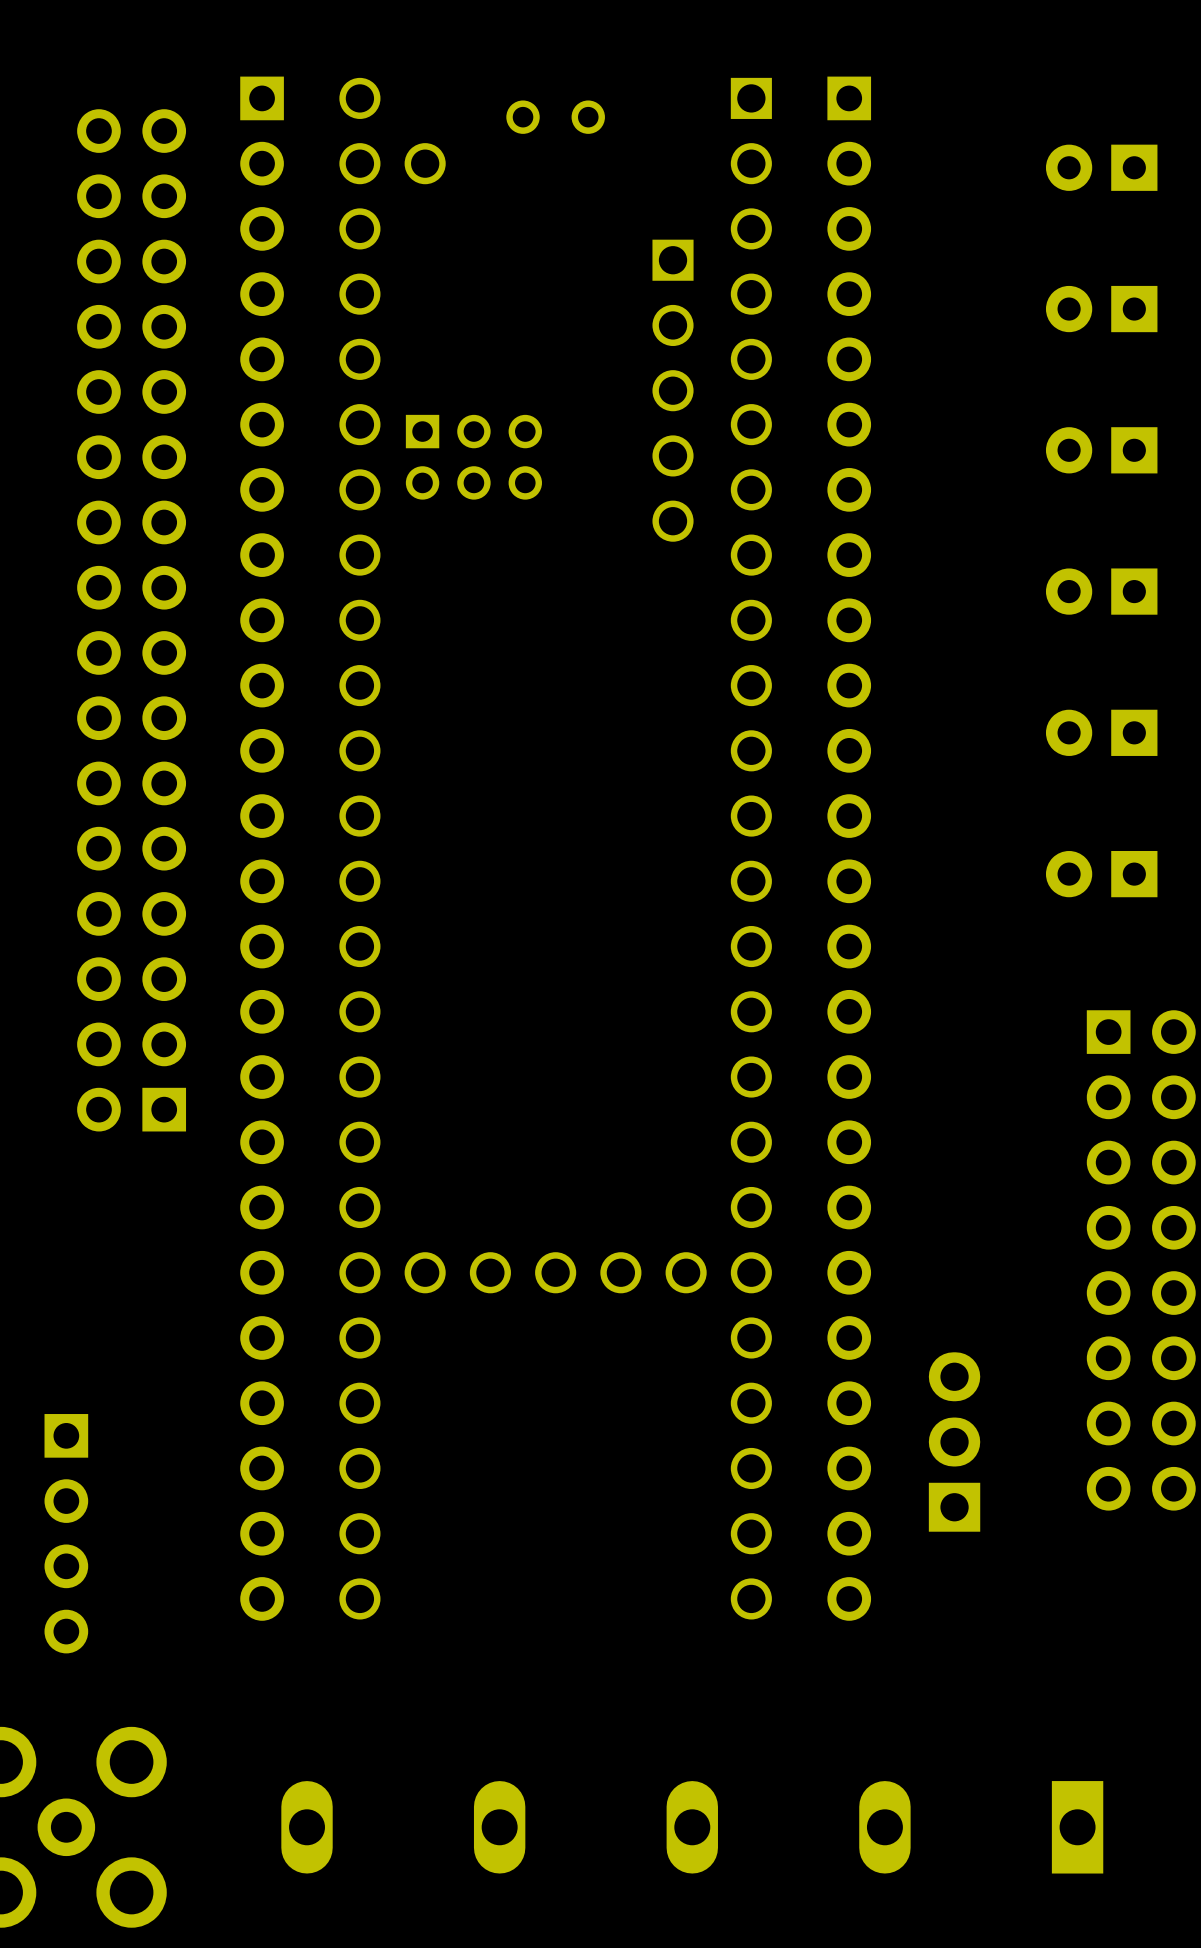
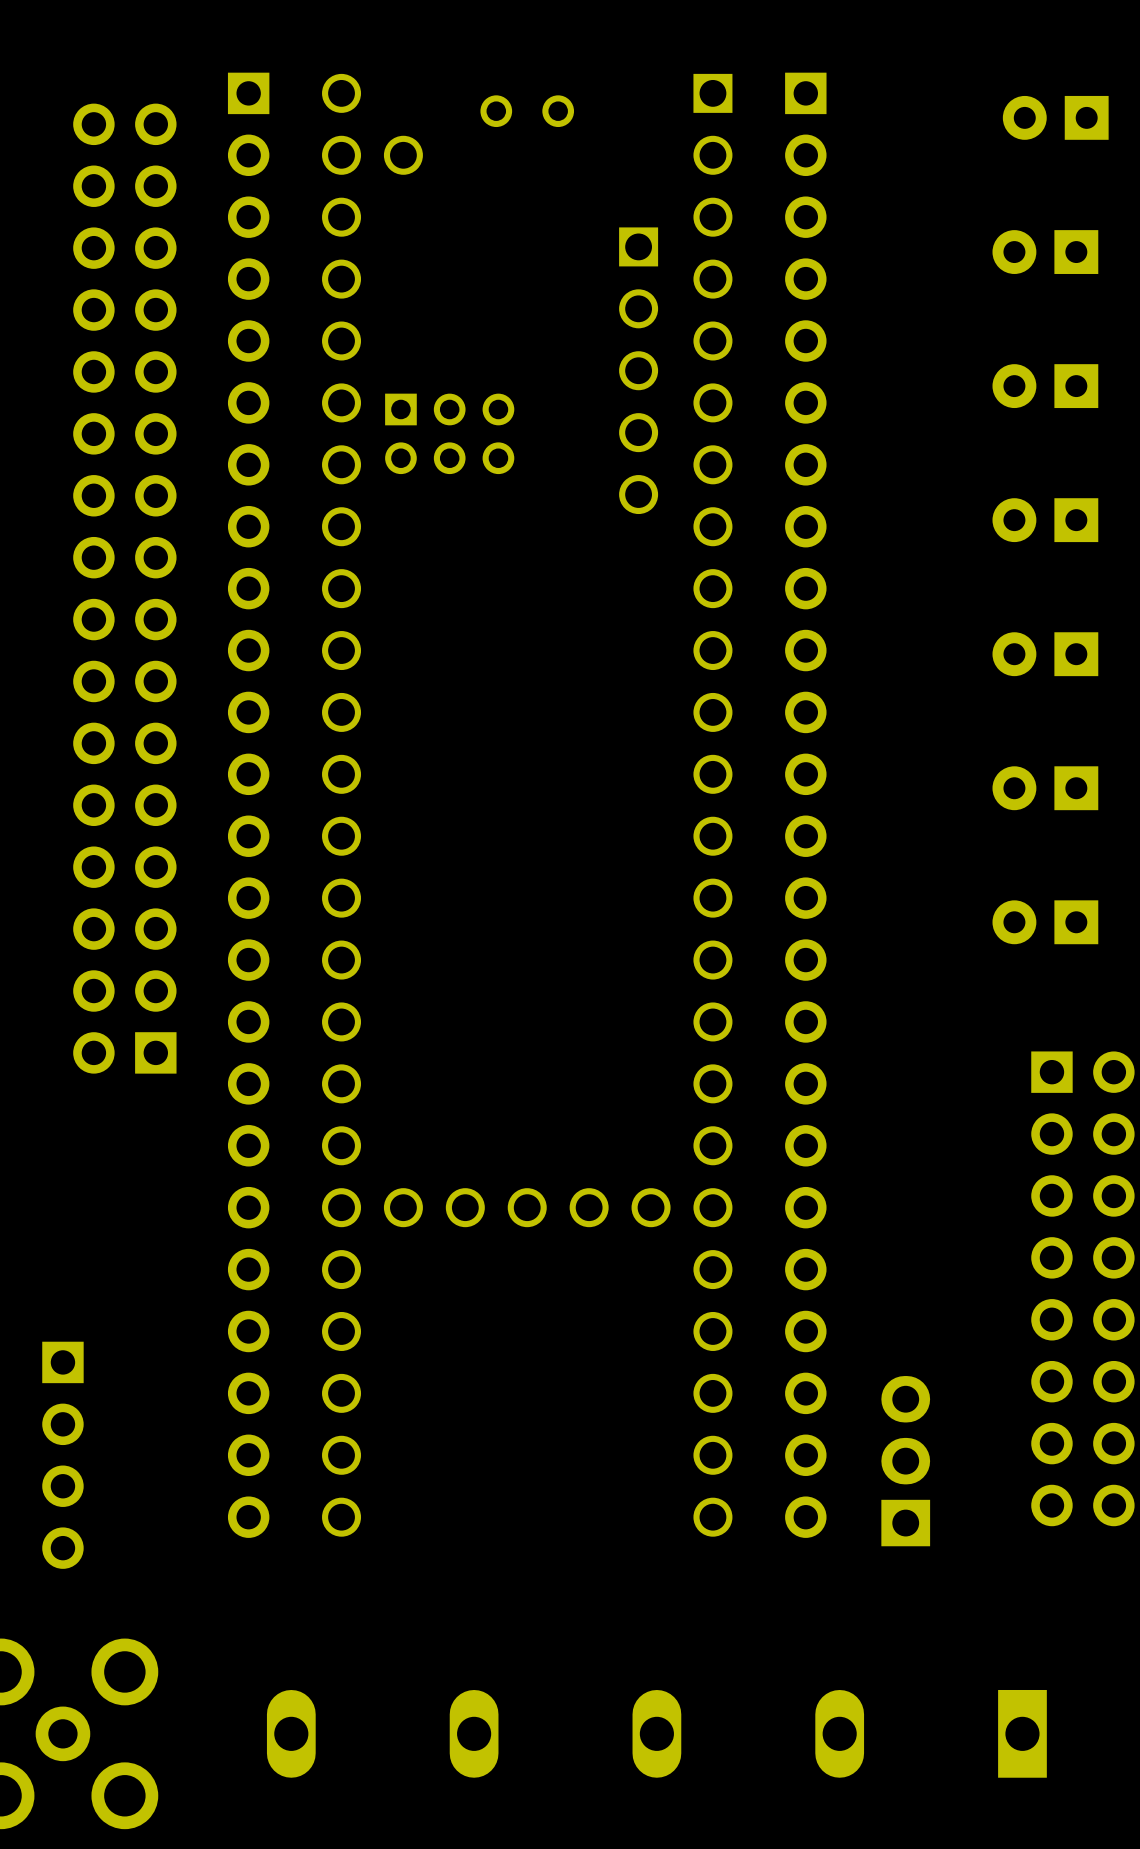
part position: (1101, 167) -> (1055, 117)
part position: (1101, 309) -> (1045, 252)
part position: (1101, 450) -> (1045, 386)
part position: (1101, 591) -> (1045, 520)
part position: (1101, 732) -> (1045, 654)
part position: (1101, 874) -> (1045, 788)
part: none -> (1045, 922)
part position: (1141, 1260) -> (1082, 1288)
part position: (954, 1442) -> (905, 1461)

